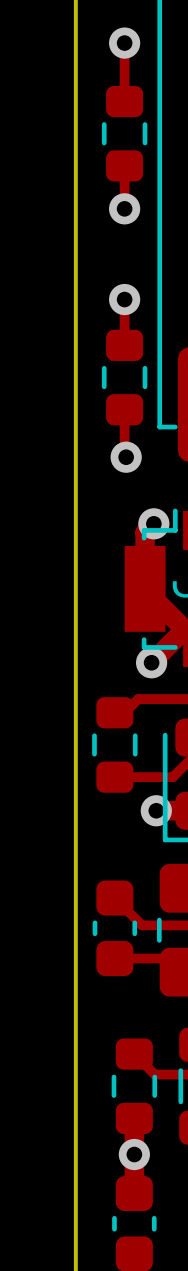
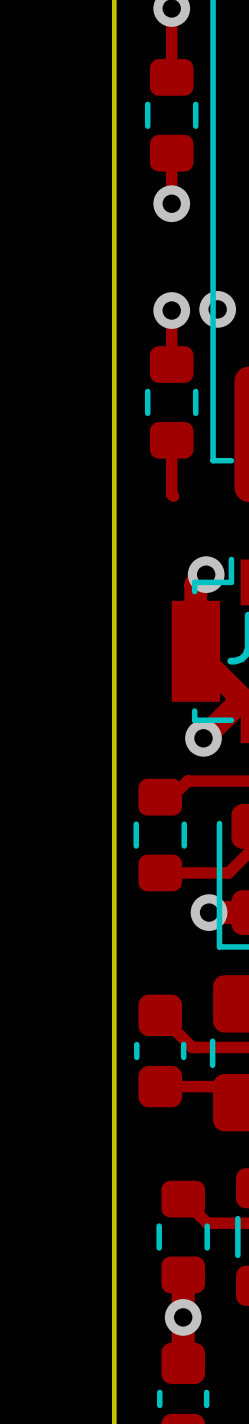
via position: (126, 457) -> (217, 309)

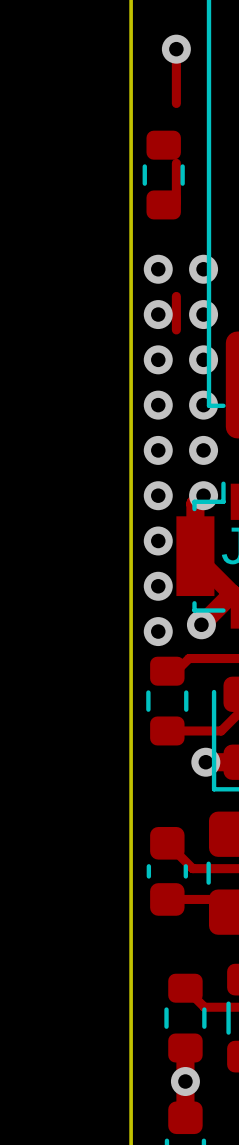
part position: (171, 115) -> (163, 175)
via: (171, 203) -> none
via: none -> (158, 269)
via: none -> (203, 269)
via: (217, 309) -> none
via: (171, 310) -> none
via: none -> (158, 314)
via: none -> (203, 314)
via: none -> (158, 359)
part: (171, 402) -> none
via: none -> (203, 359)
track: (171, 440) (171, 494) (173, 496) -> none
via: none -> (158, 405)
via: none -> (203, 405)
via: none -> (158, 450)
via: none -> (203, 450)
via: none -> (158, 495)
via: none -> (158, 540)
via: none -> (158, 586)
via: none -> (158, 631)

